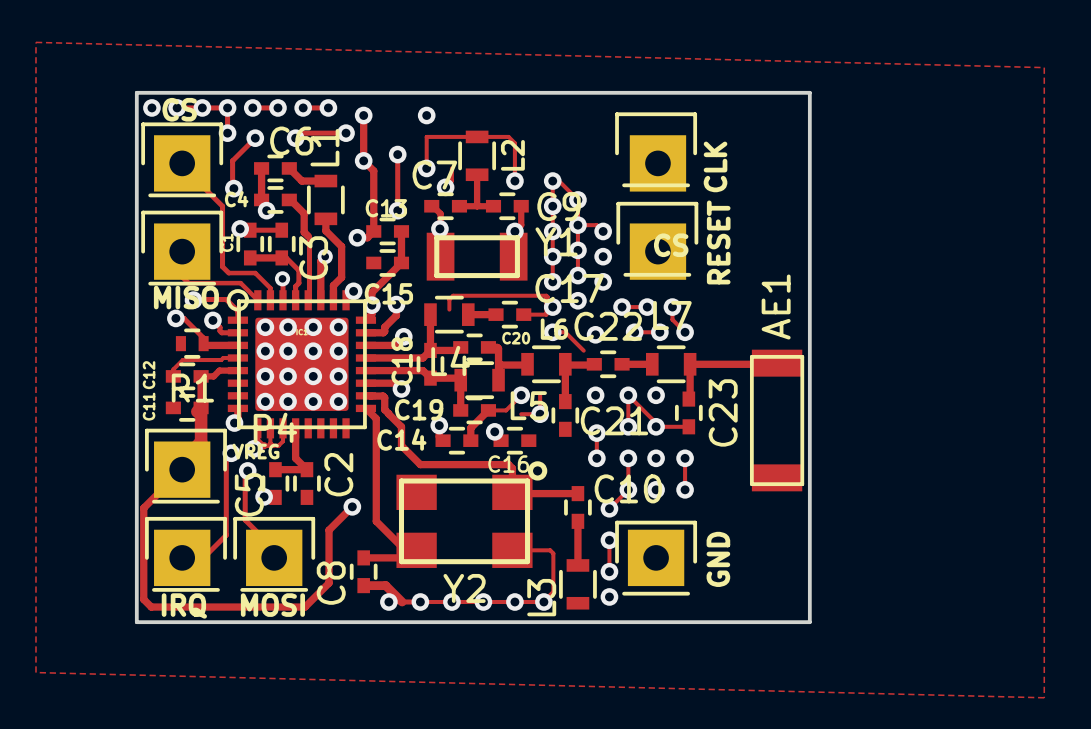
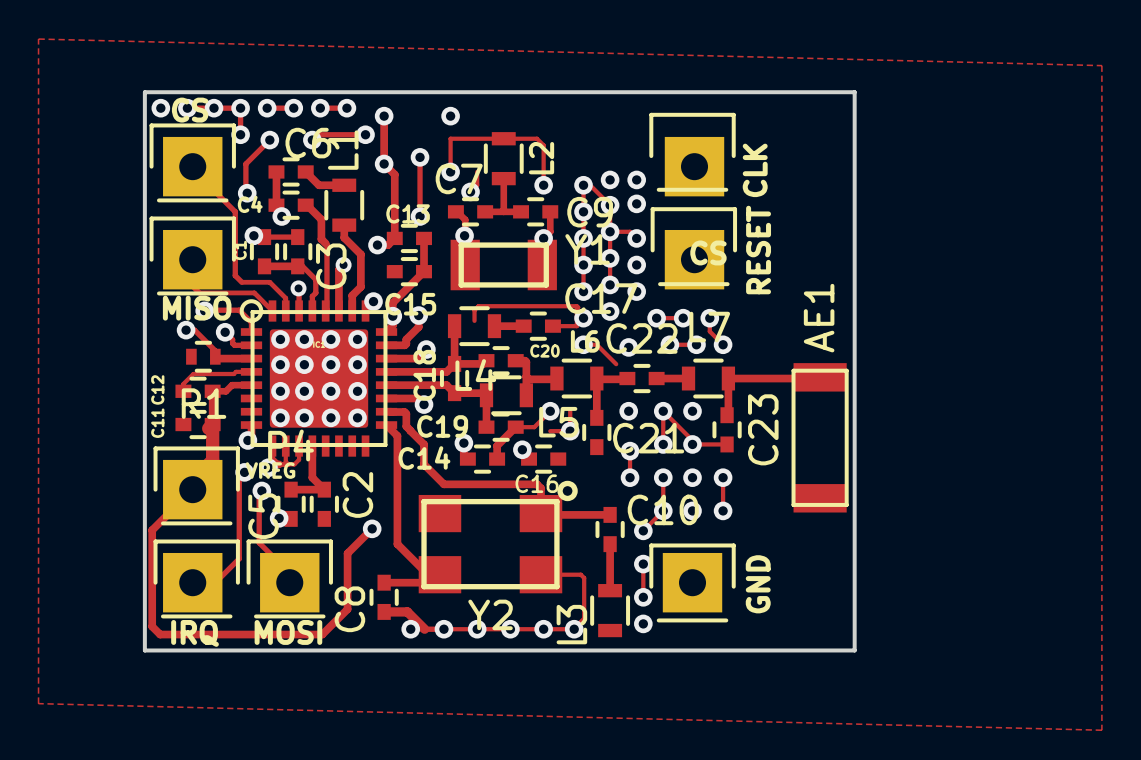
via: none -> (610, 179)
via: none -> (636, 179)
via: none -> (636, 203)

